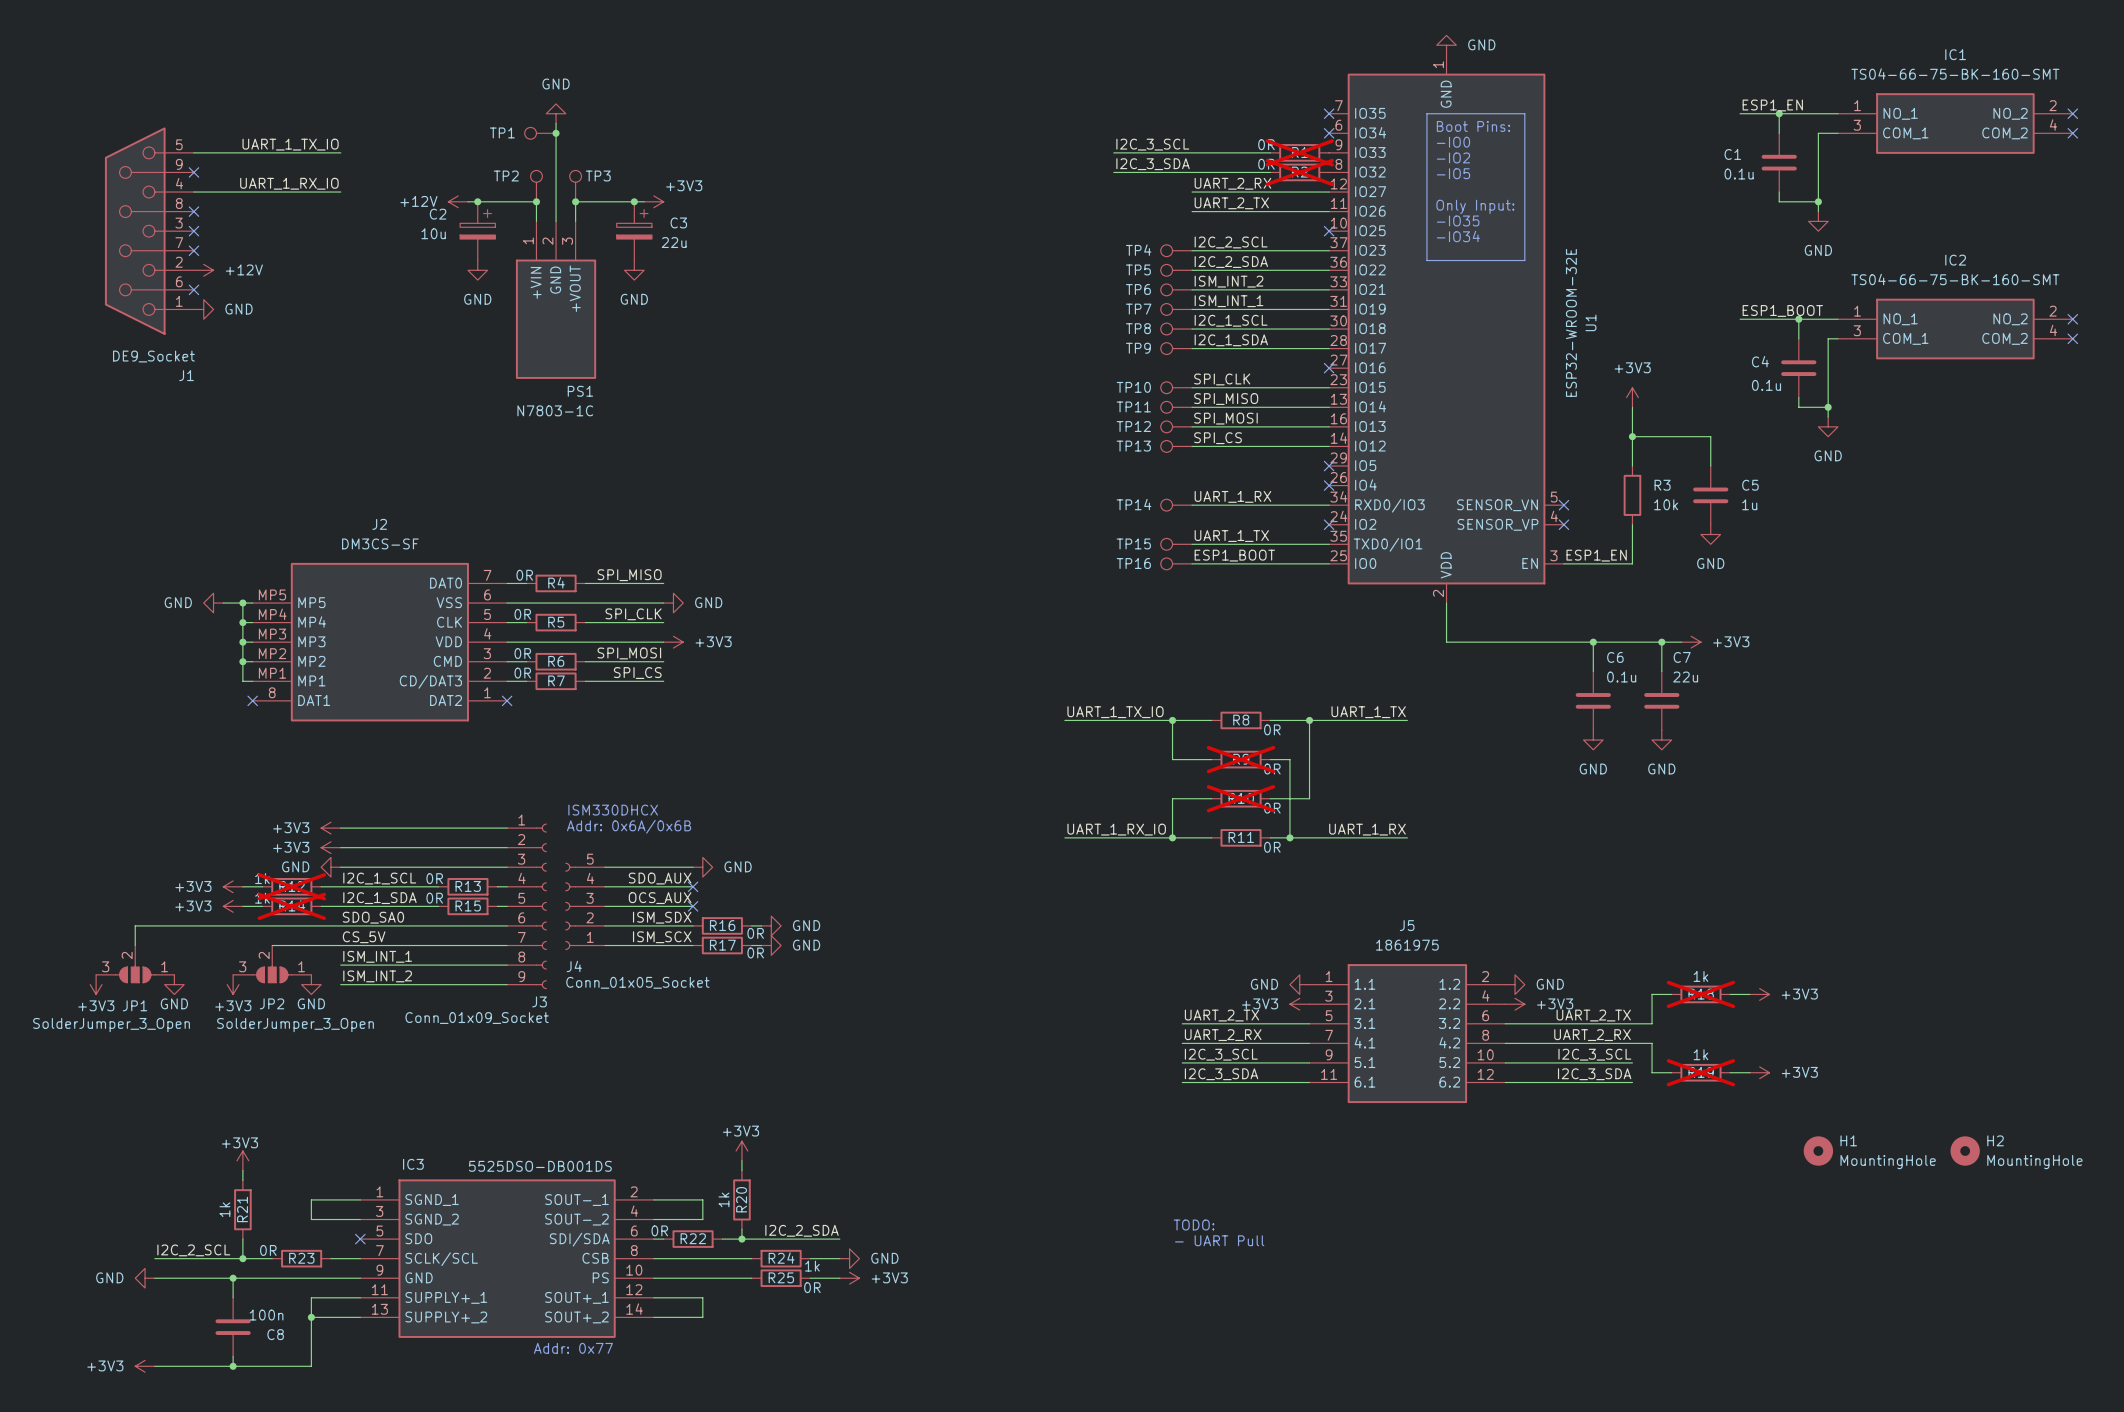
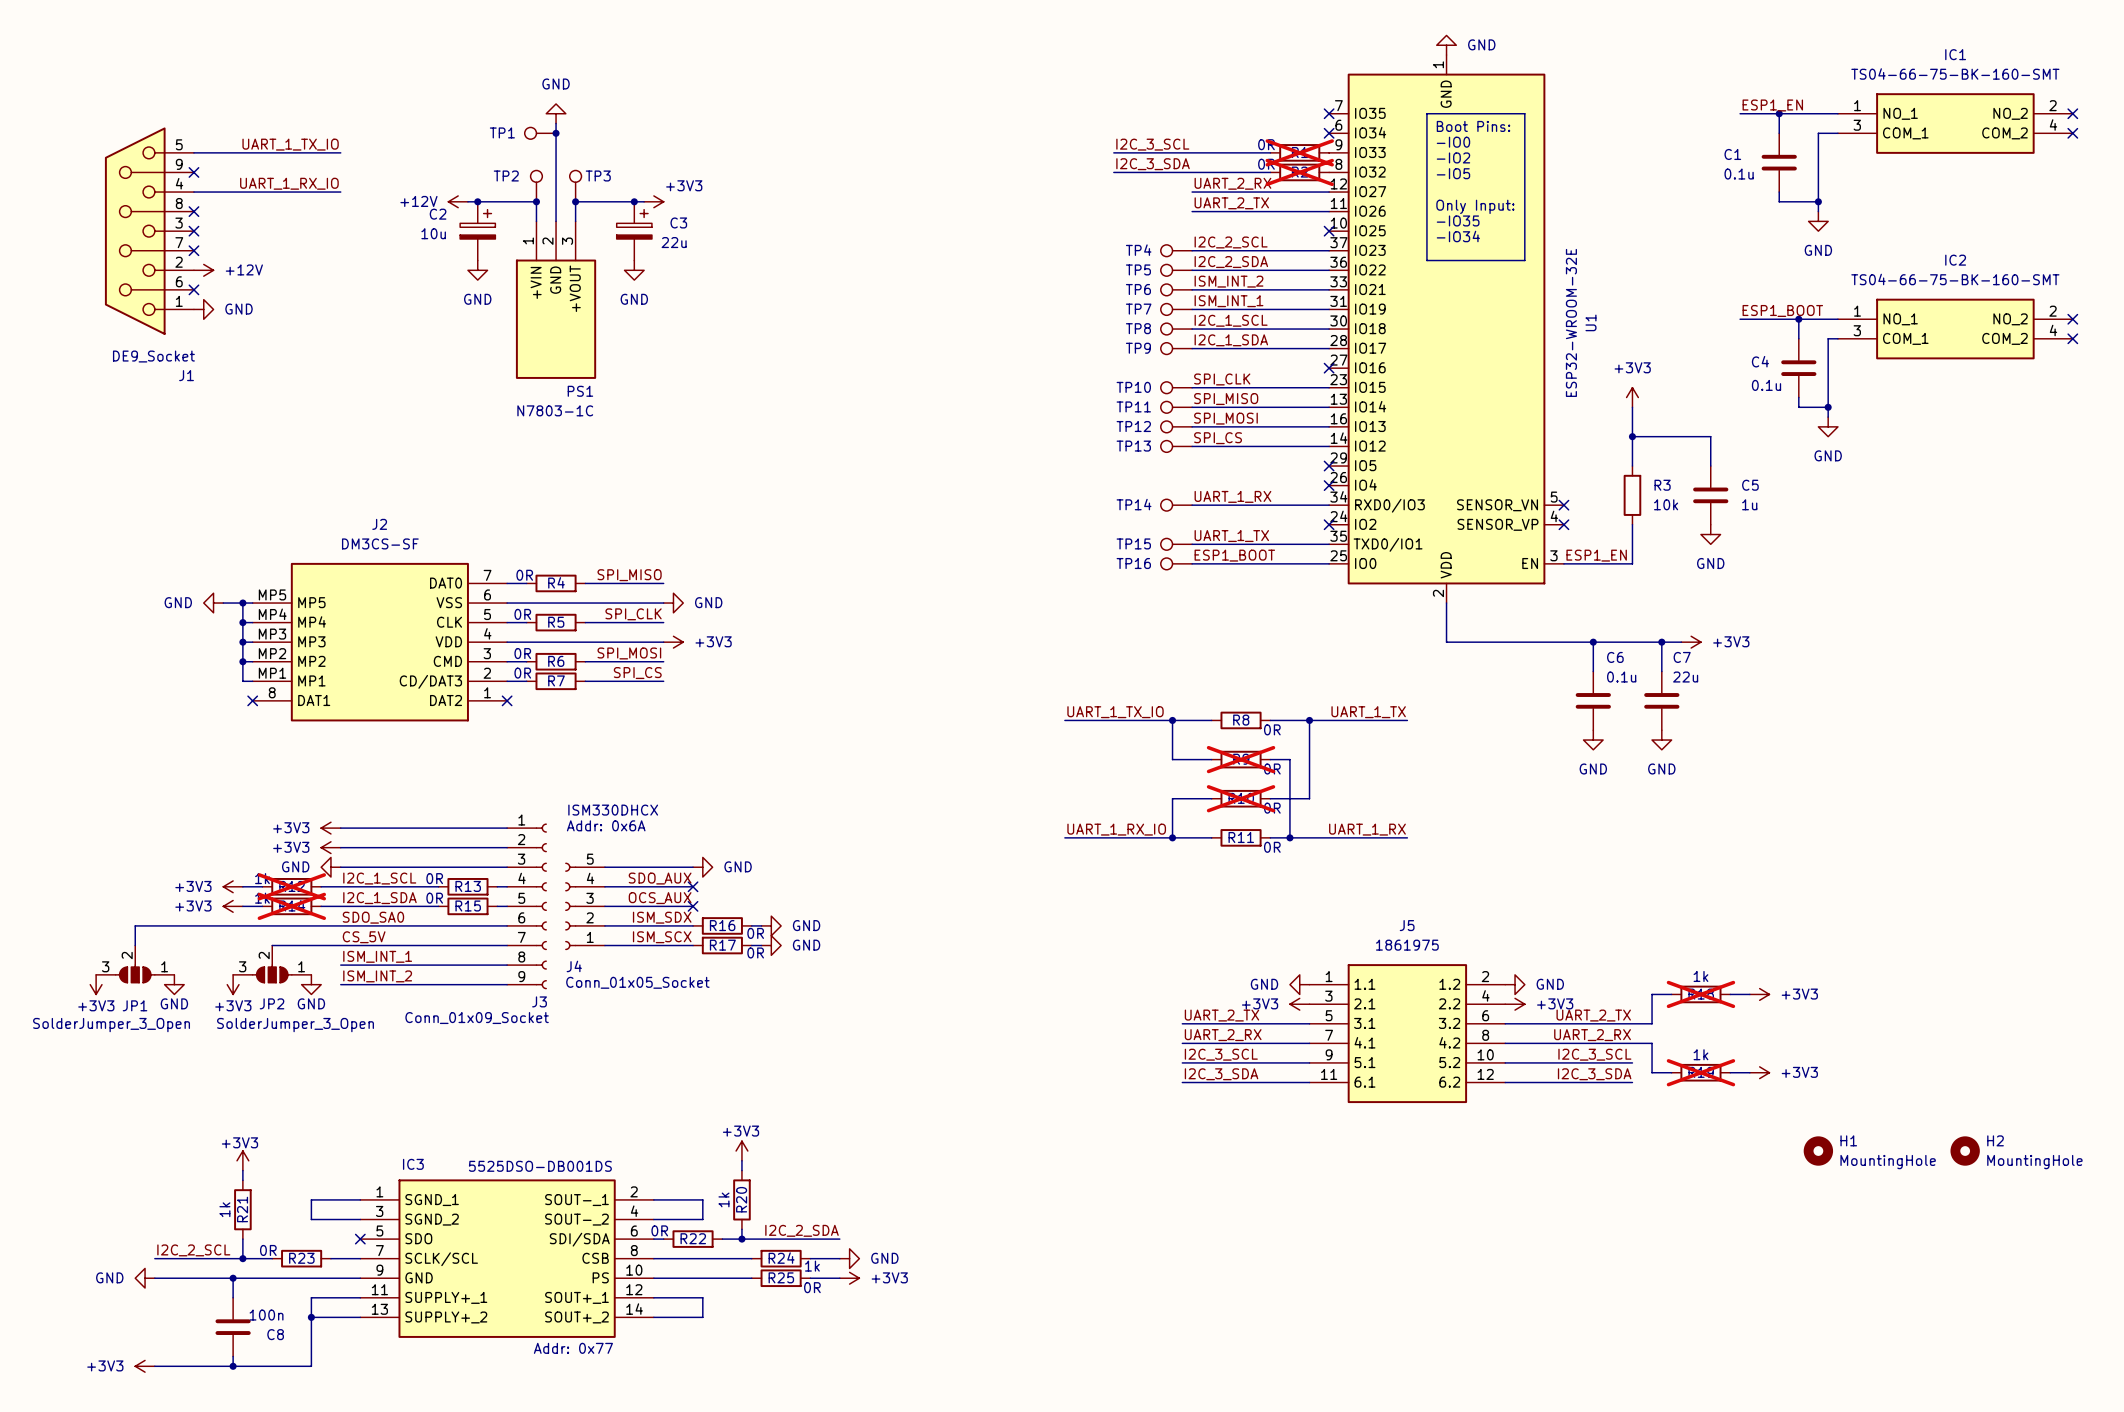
text: Addr: 0x6A/0x6B (629, 826) -> Addr: 0x6A (606, 825)
text: TODO: (1194, 1225) -> none
text: - UART Pull (1219, 1240) -> none

